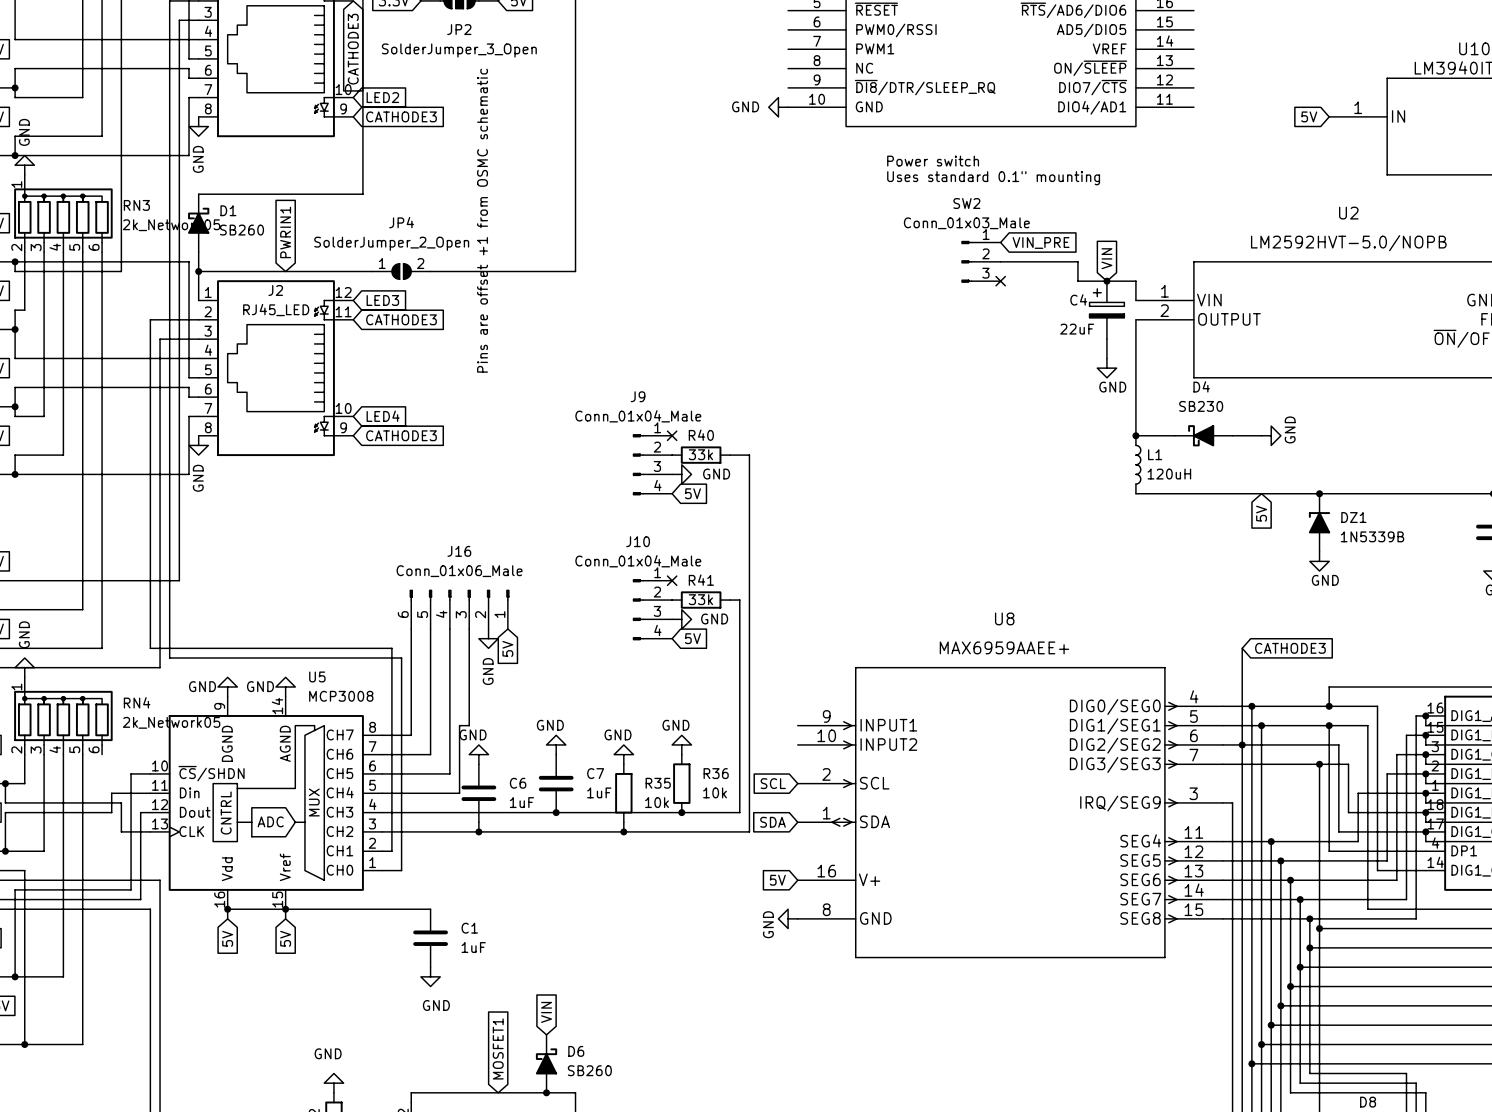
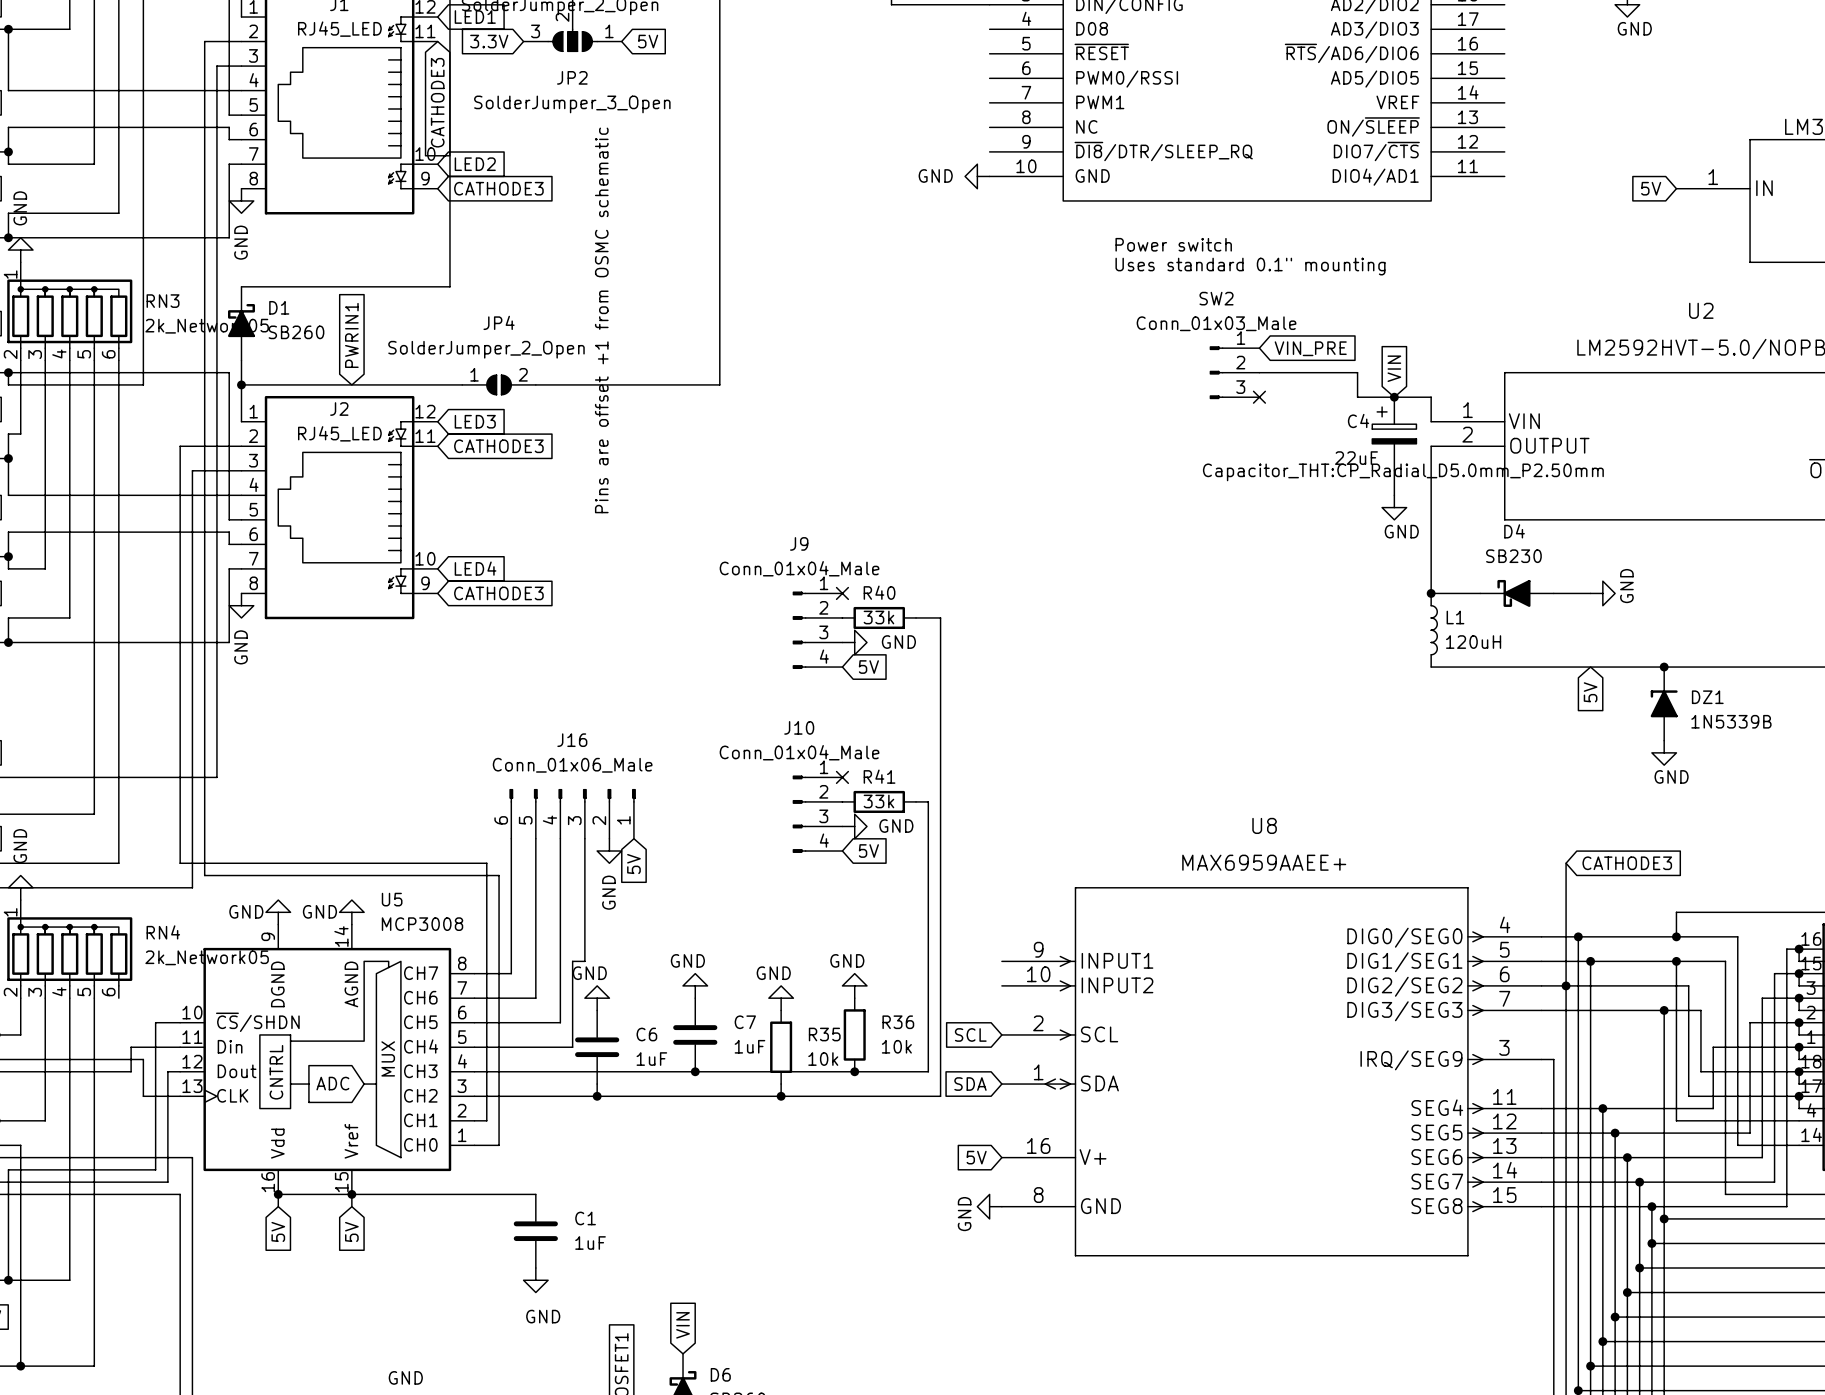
C4 text: none -> Capacitor_THT:CP_Radial_D5.0mm_P2.50mm (1403, 472)

